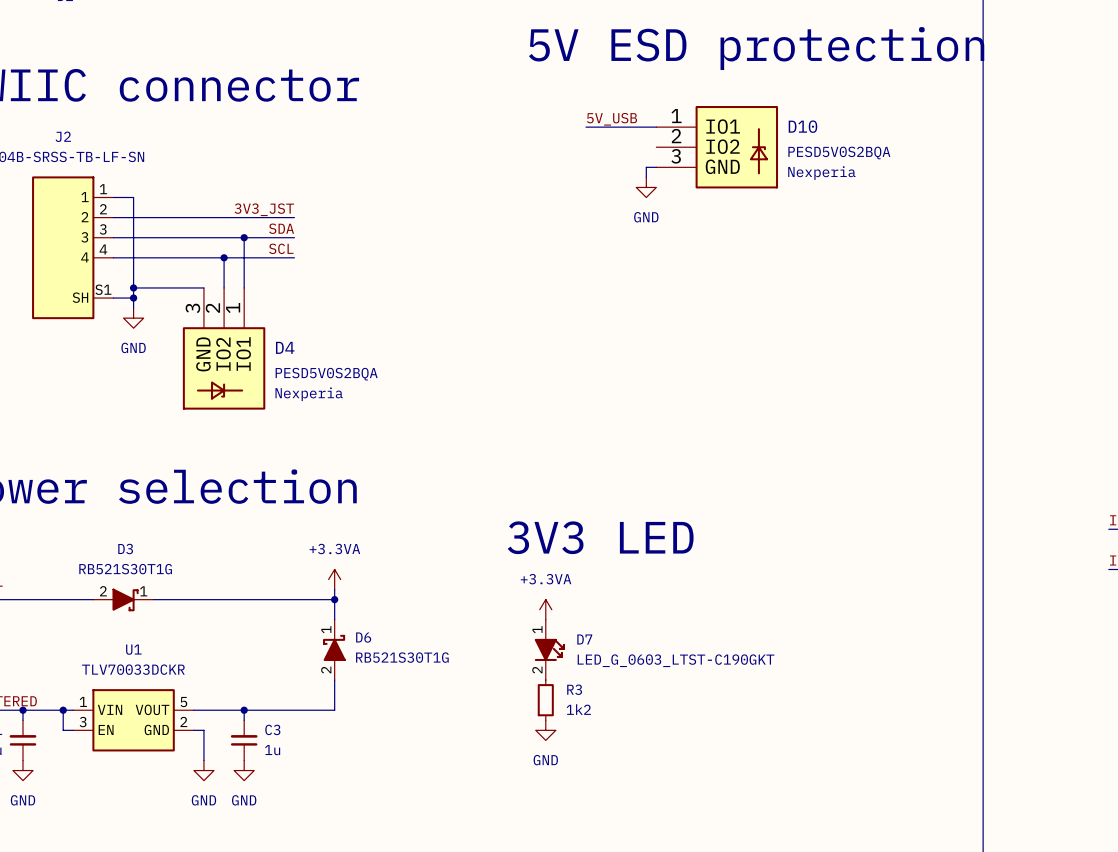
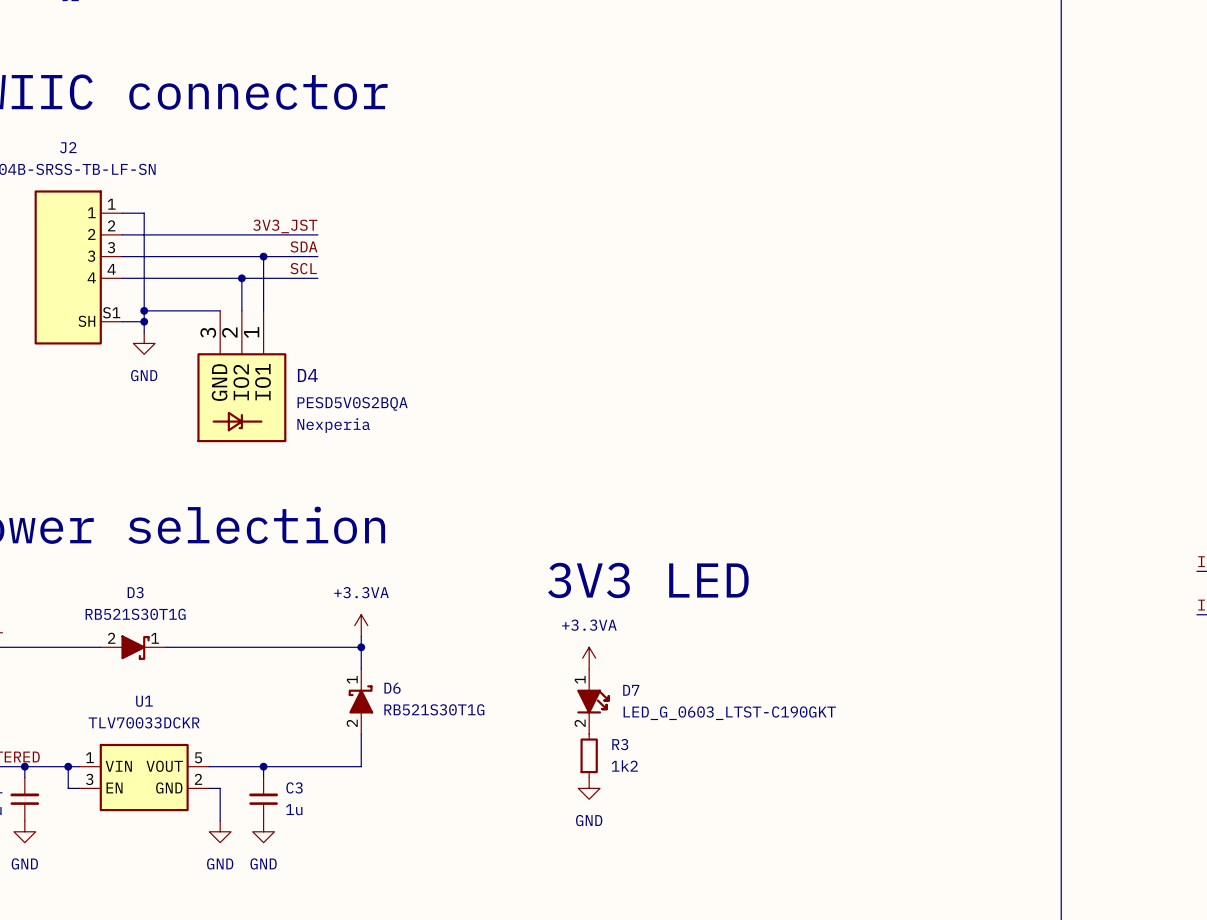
text: 5V ESD protection (756, 48) -> none
label: 5V_USB (612, 119) -> none
wire: (586, 127) (656, 127) -> none
D10: (717, 147) -> none
wire: (656, 167) (646, 167) (646, 177) -> none
power symbol: GND (646, 187) -> none

